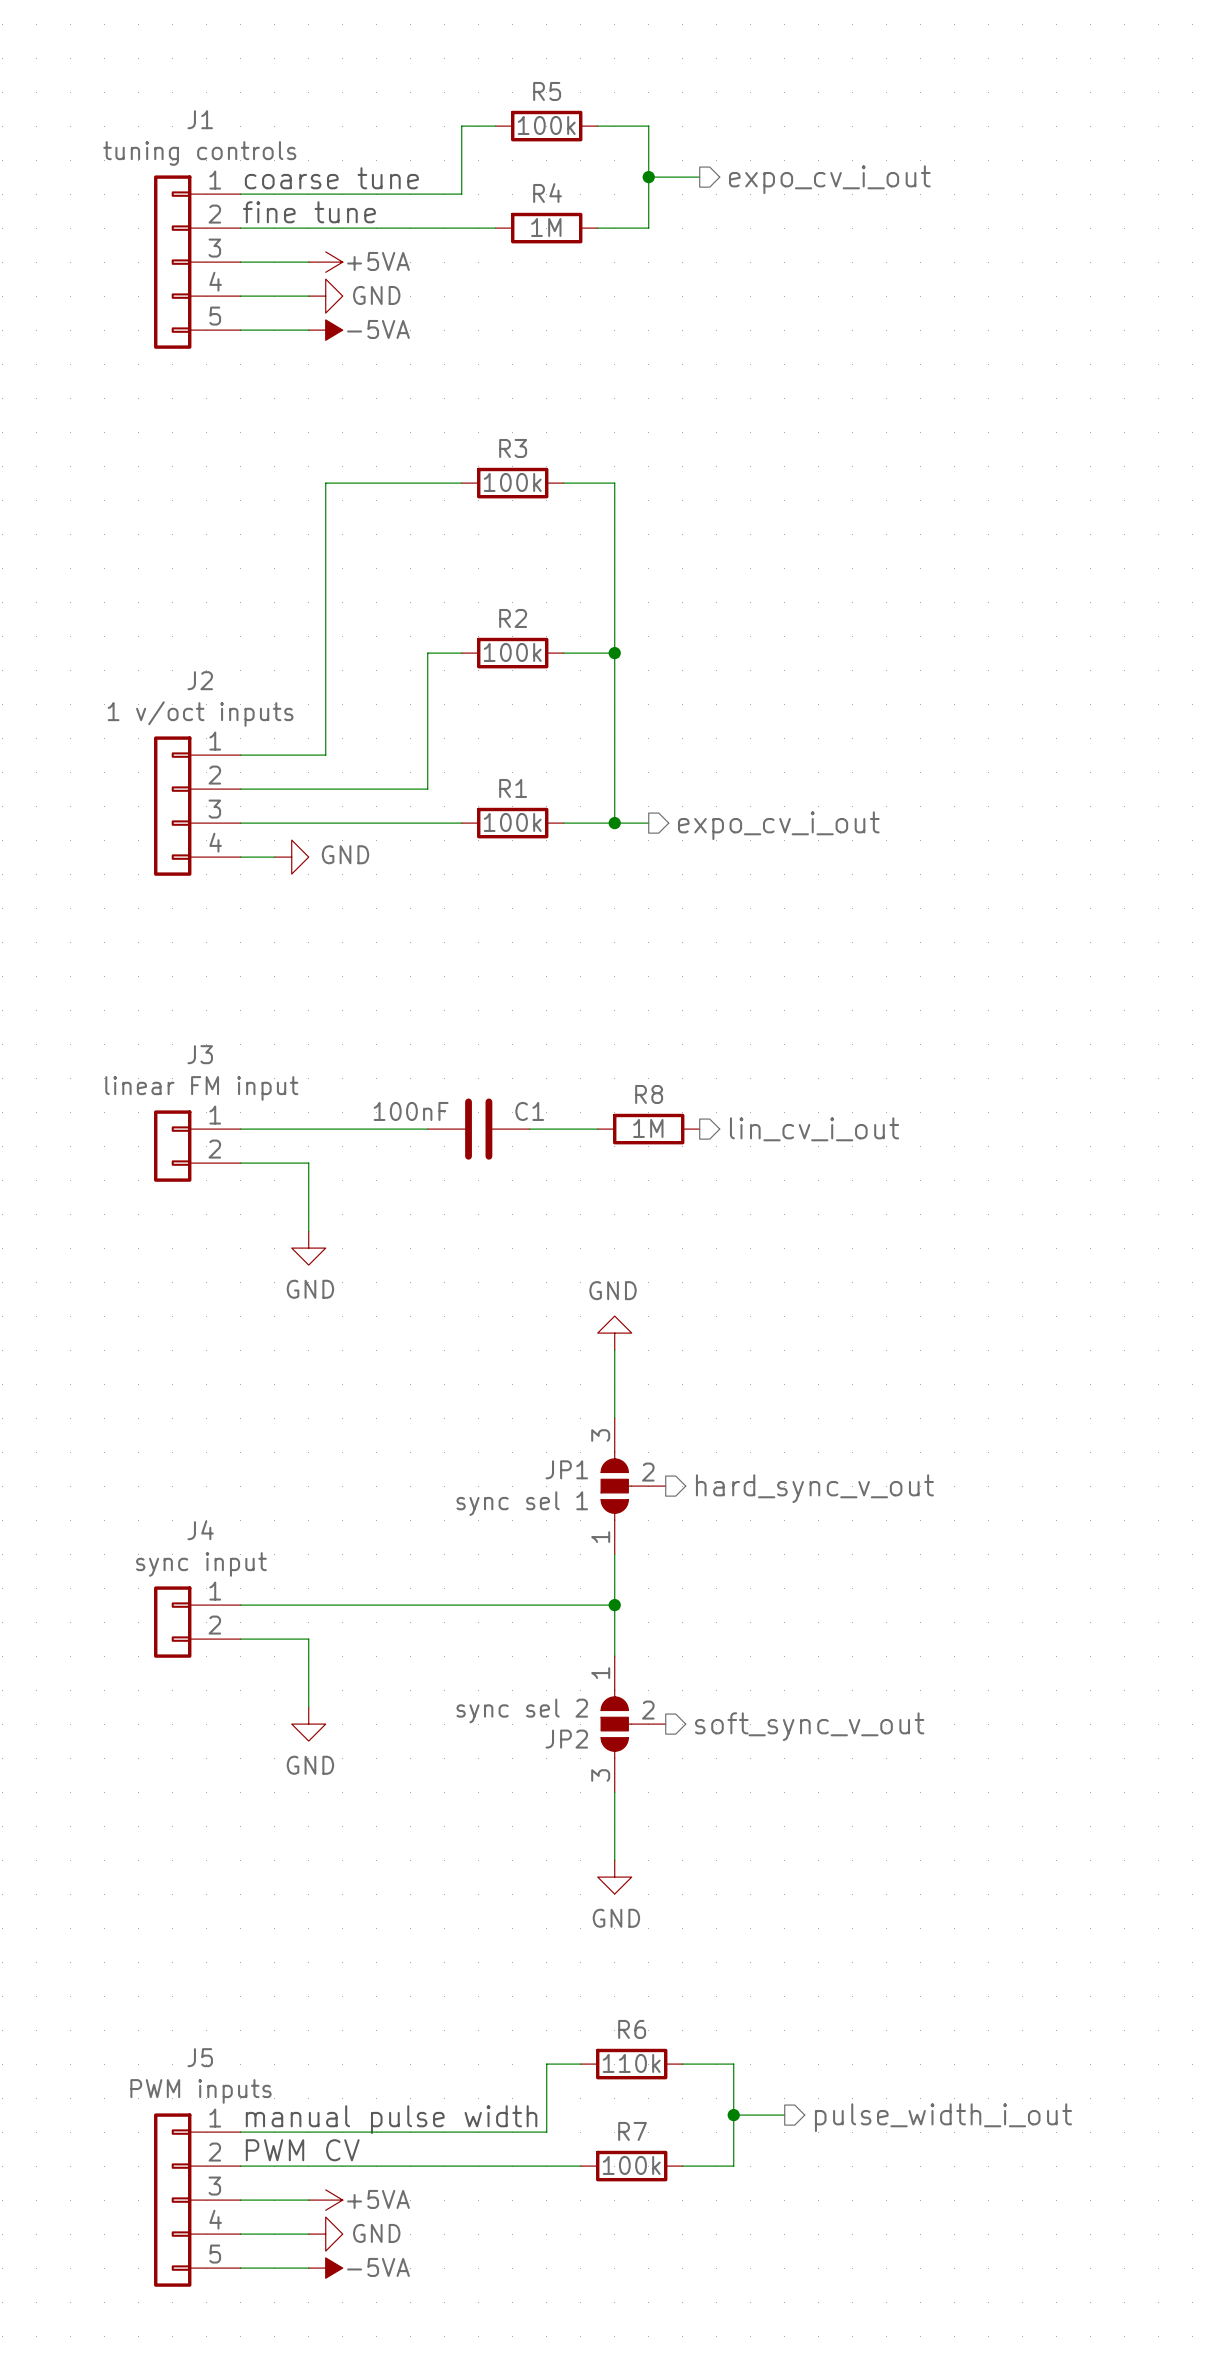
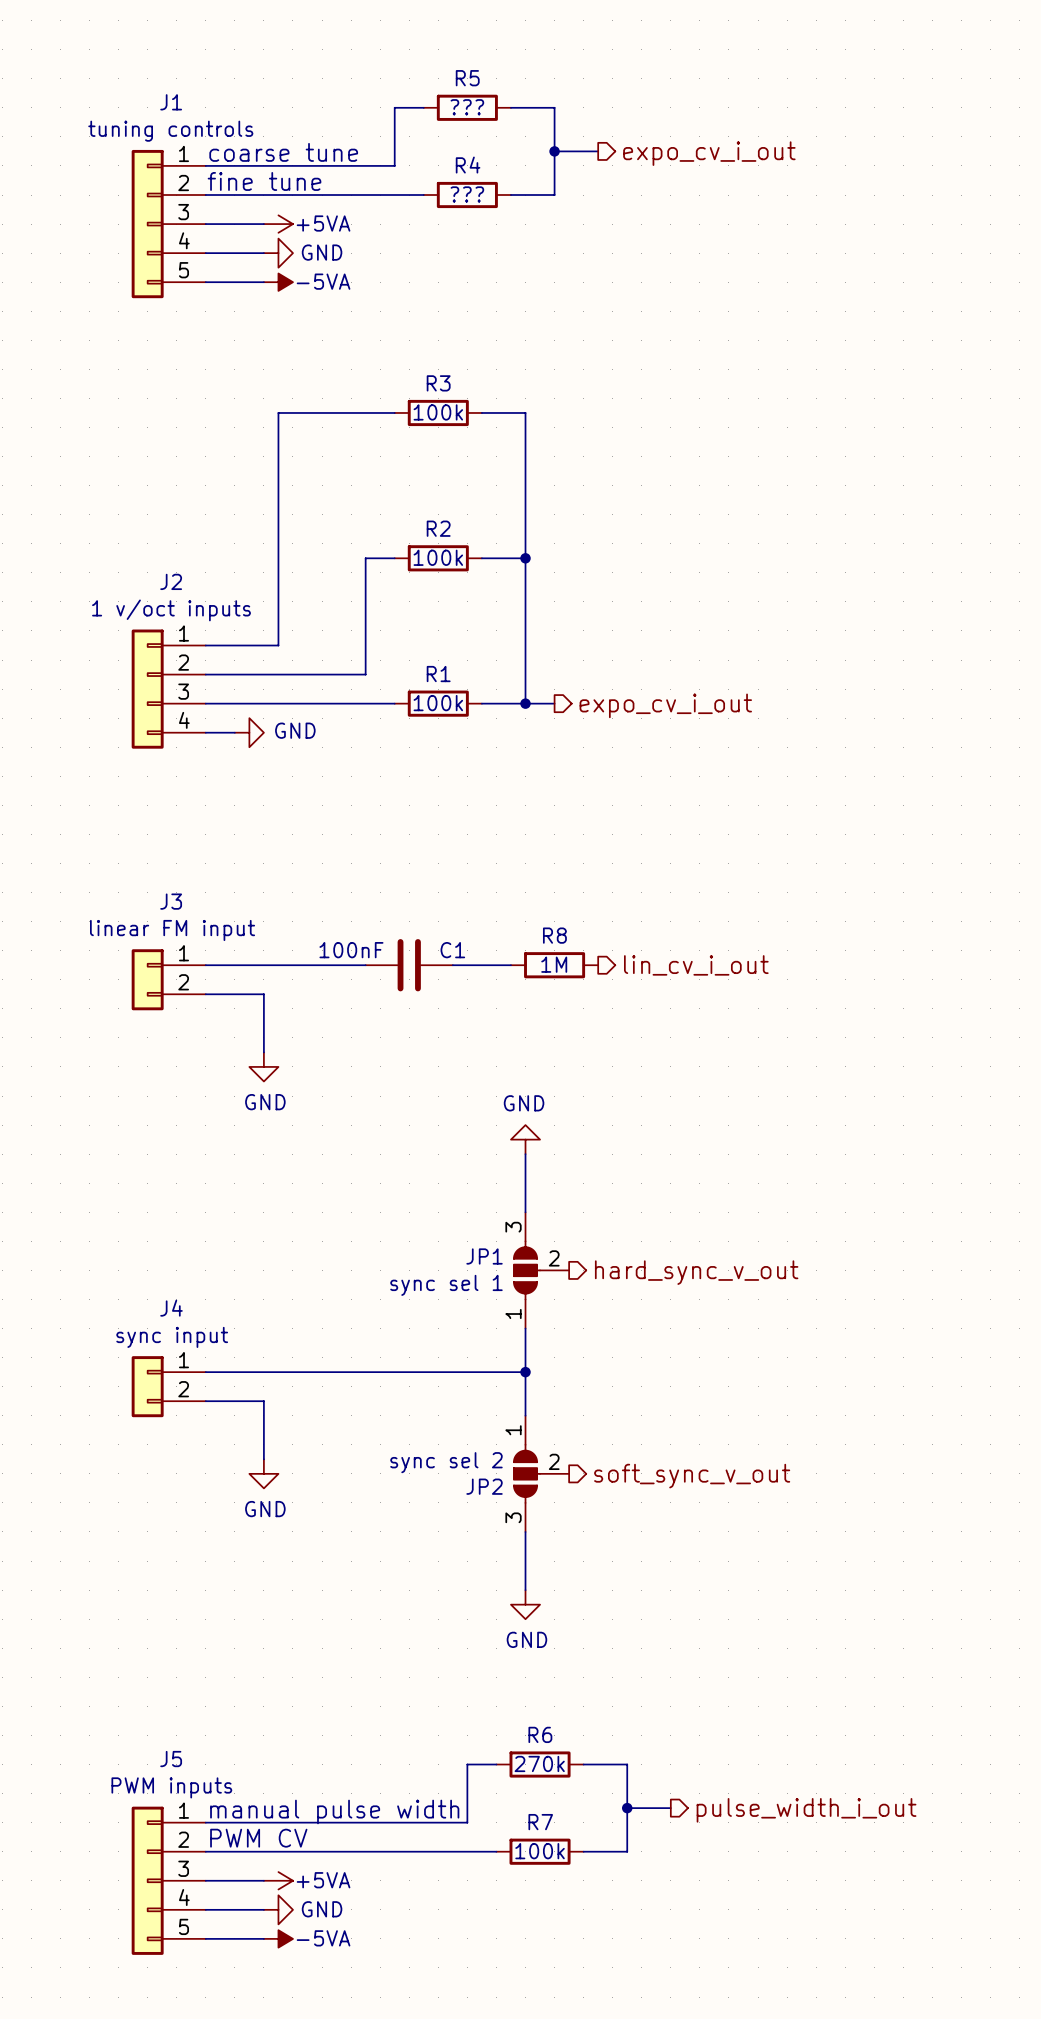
R5 value: 100k (546, 125) -> ??? (467, 107)
R4 value: 1M (546, 227) -> ??? (467, 194)
R6 value: 110k (631, 2063) -> 270k (539, 1763)

